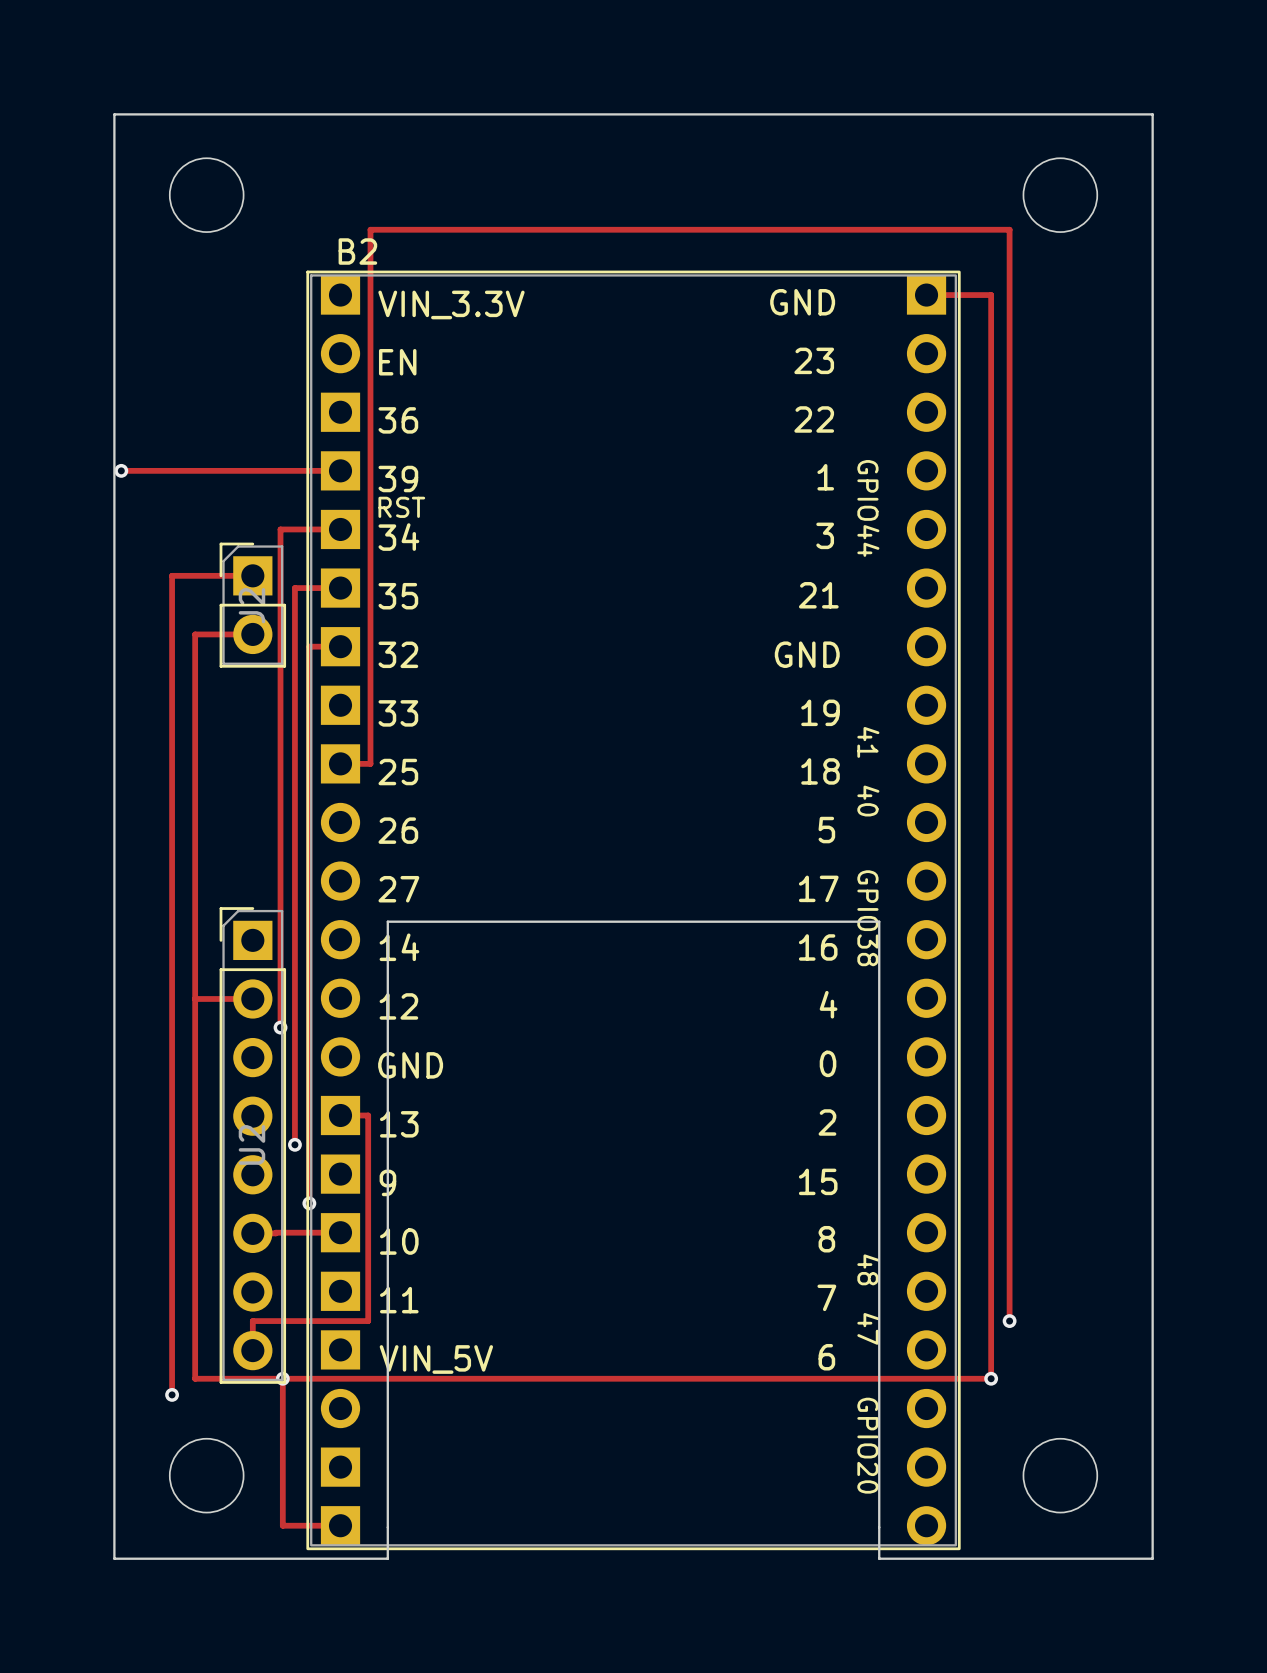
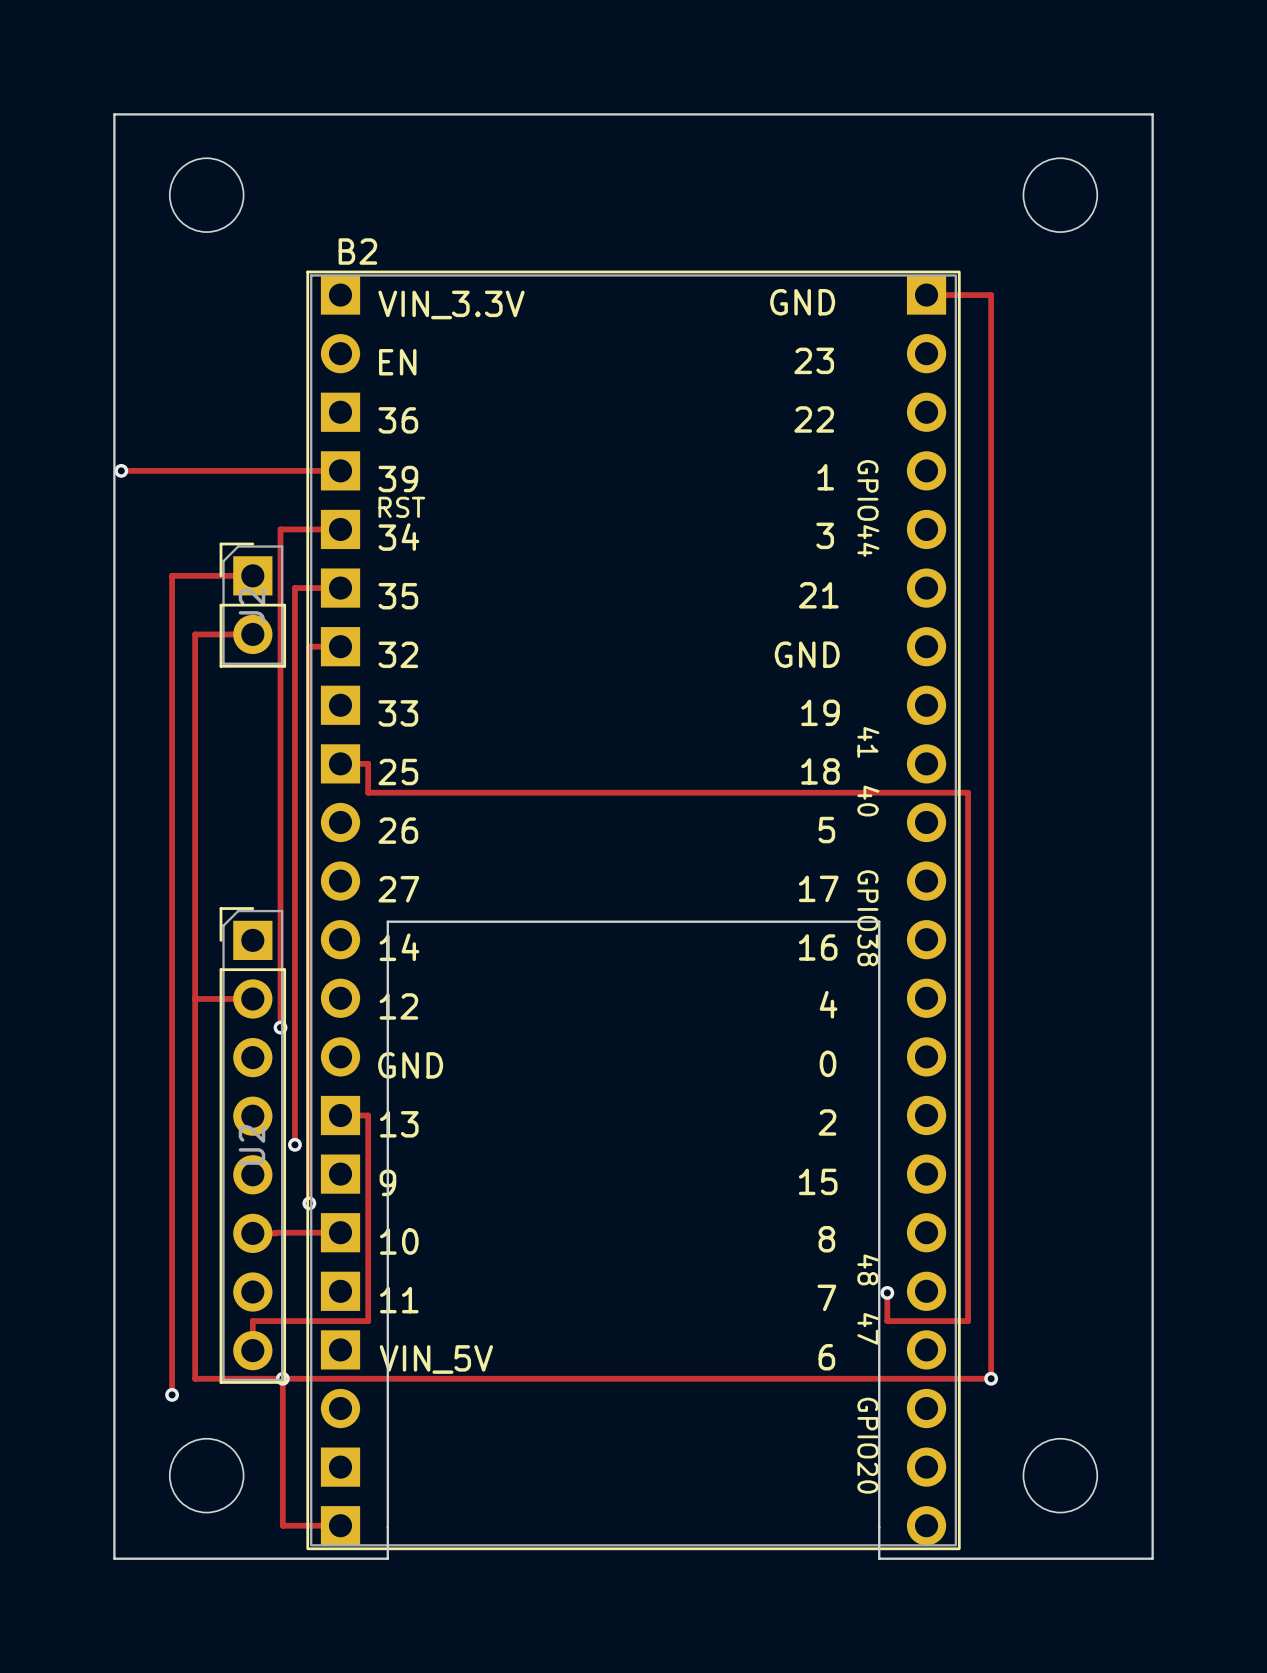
track: (368, 763) (370, 763) (370, 229) (1009, 229) (1009, 1321) -> (368, 763) (368, 792) (968, 792) (968, 1321) (887, 1321) (887, 1292)
via position: (1009, 1321) -> (887, 1292)

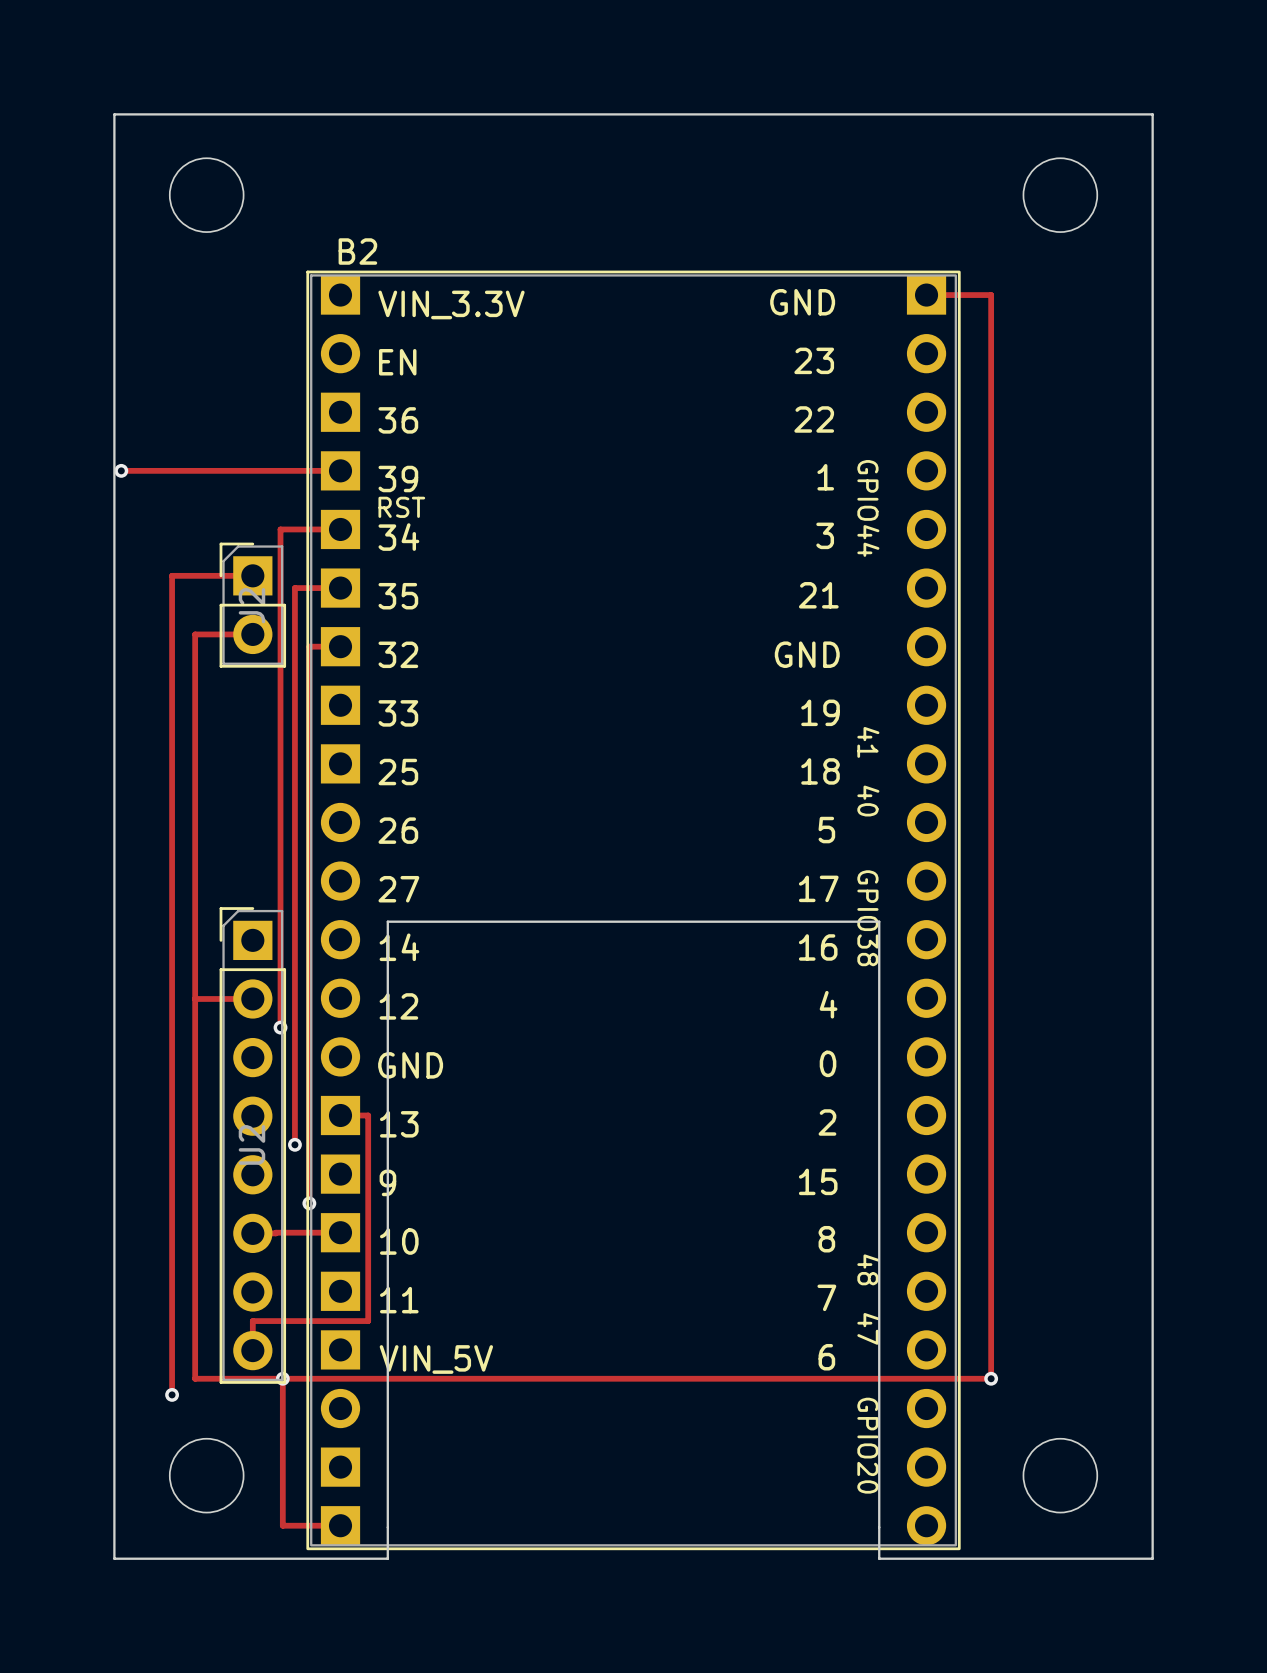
track: (340, 763) (368, 763) (368, 792) (968, 792) (968, 1321) (887, 1321) (887, 1292) -> none
via: (887, 1292) -> none

